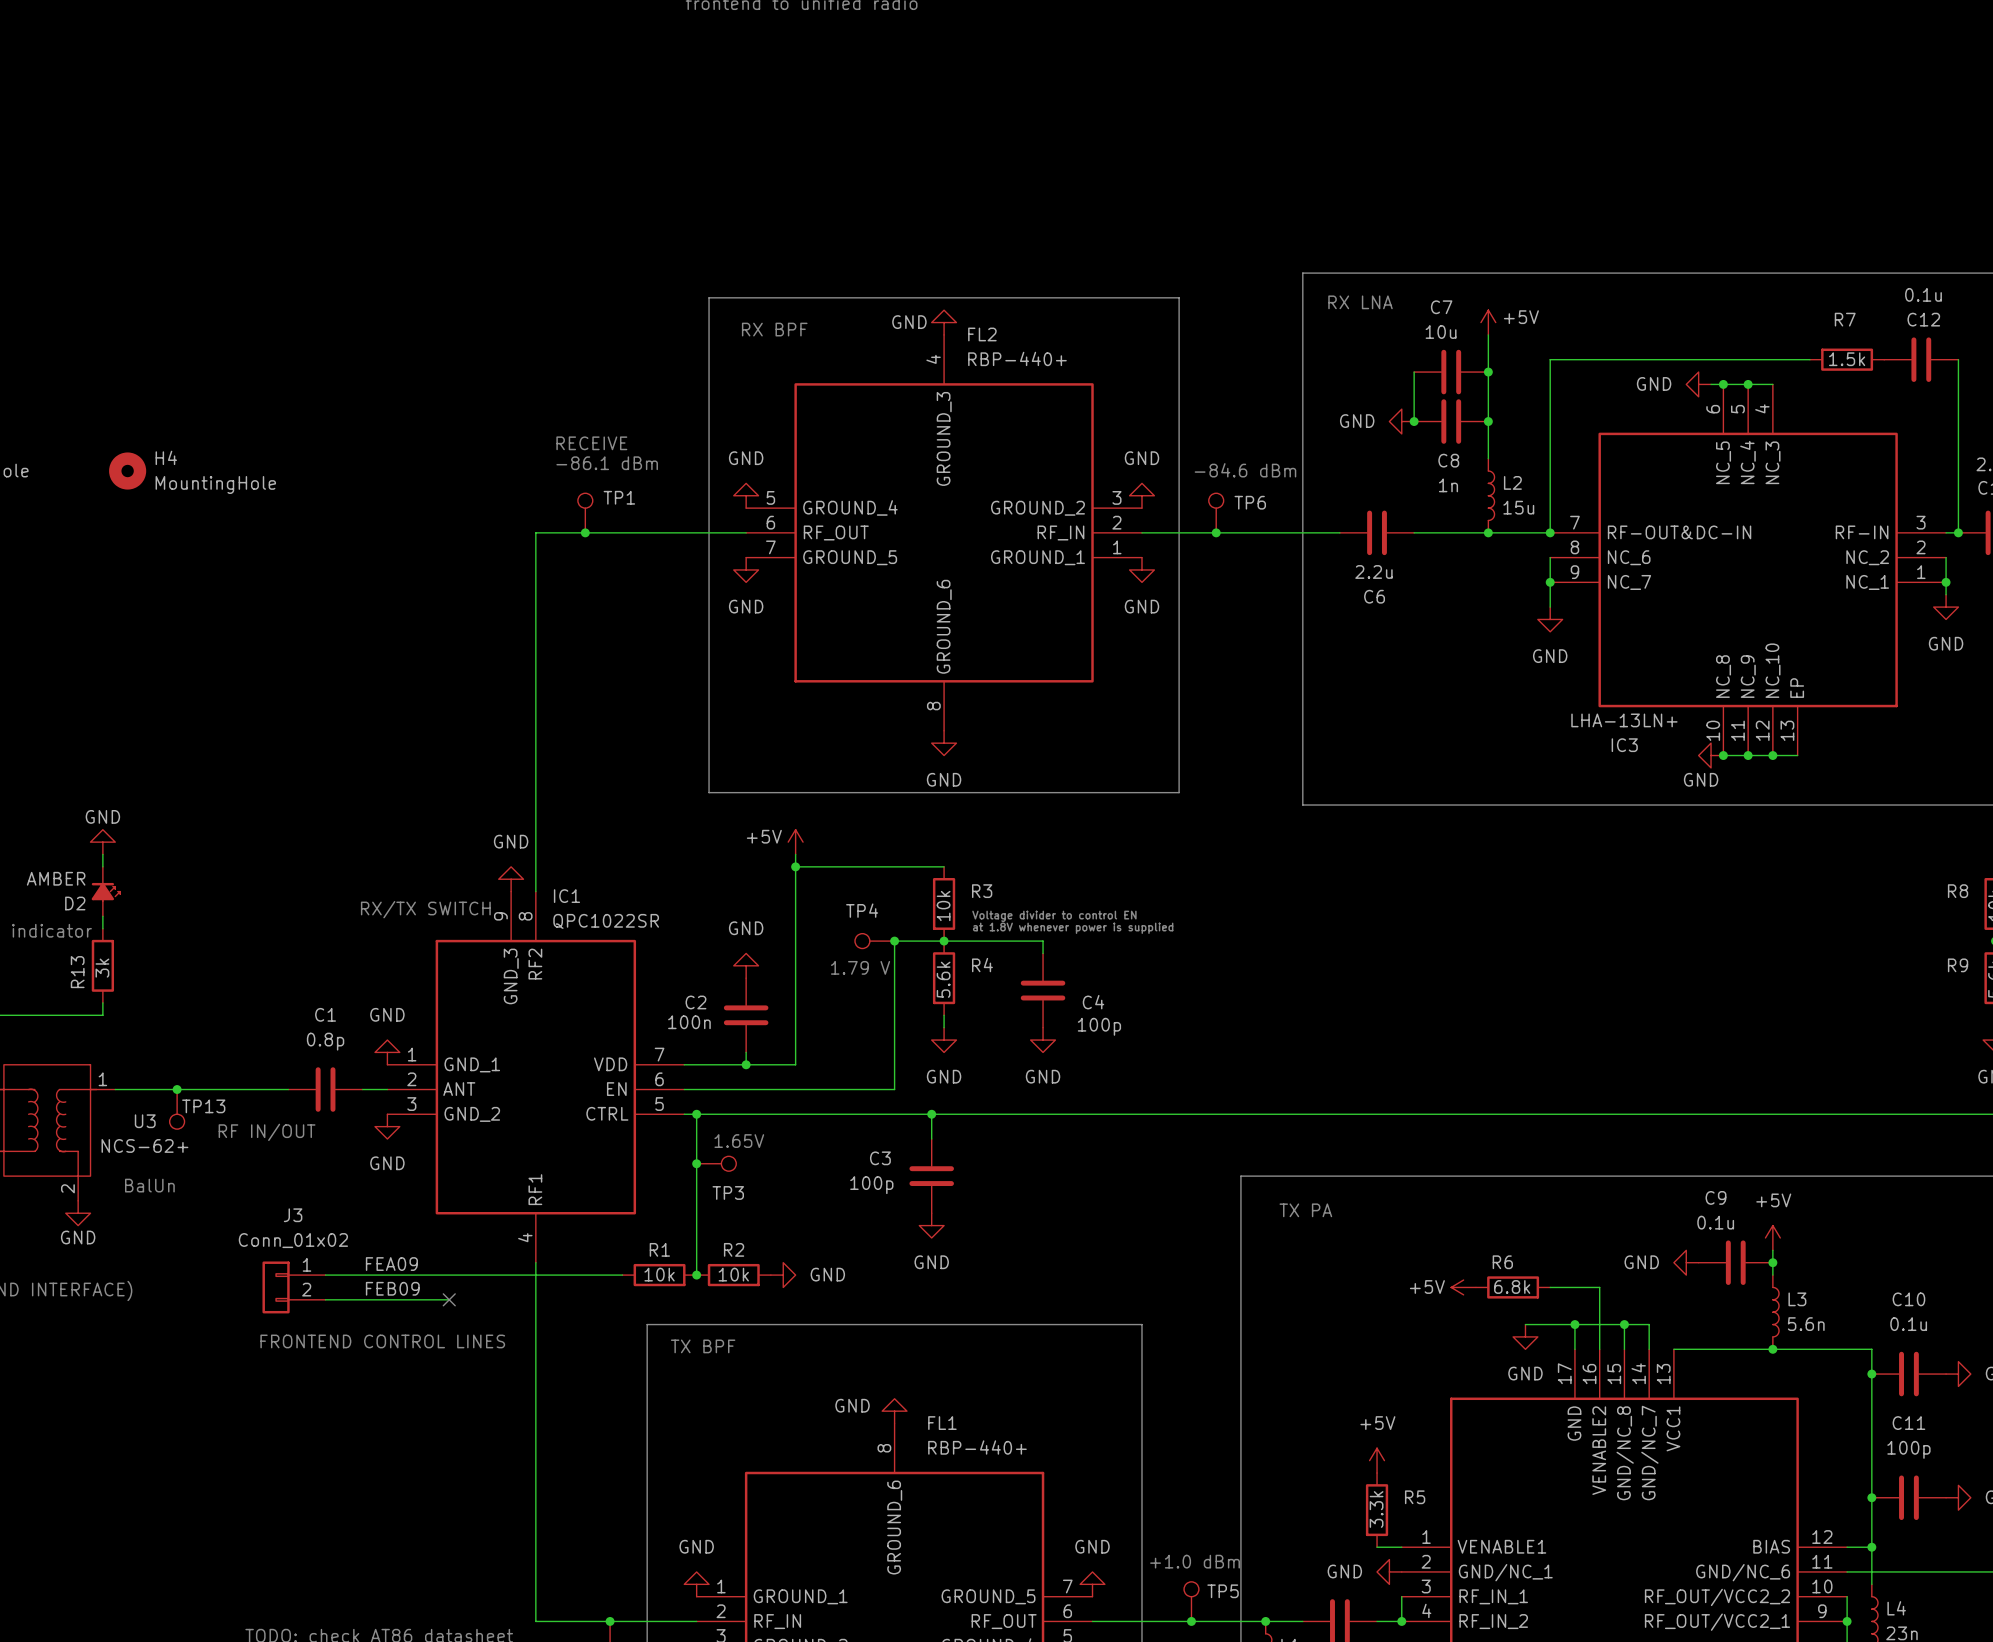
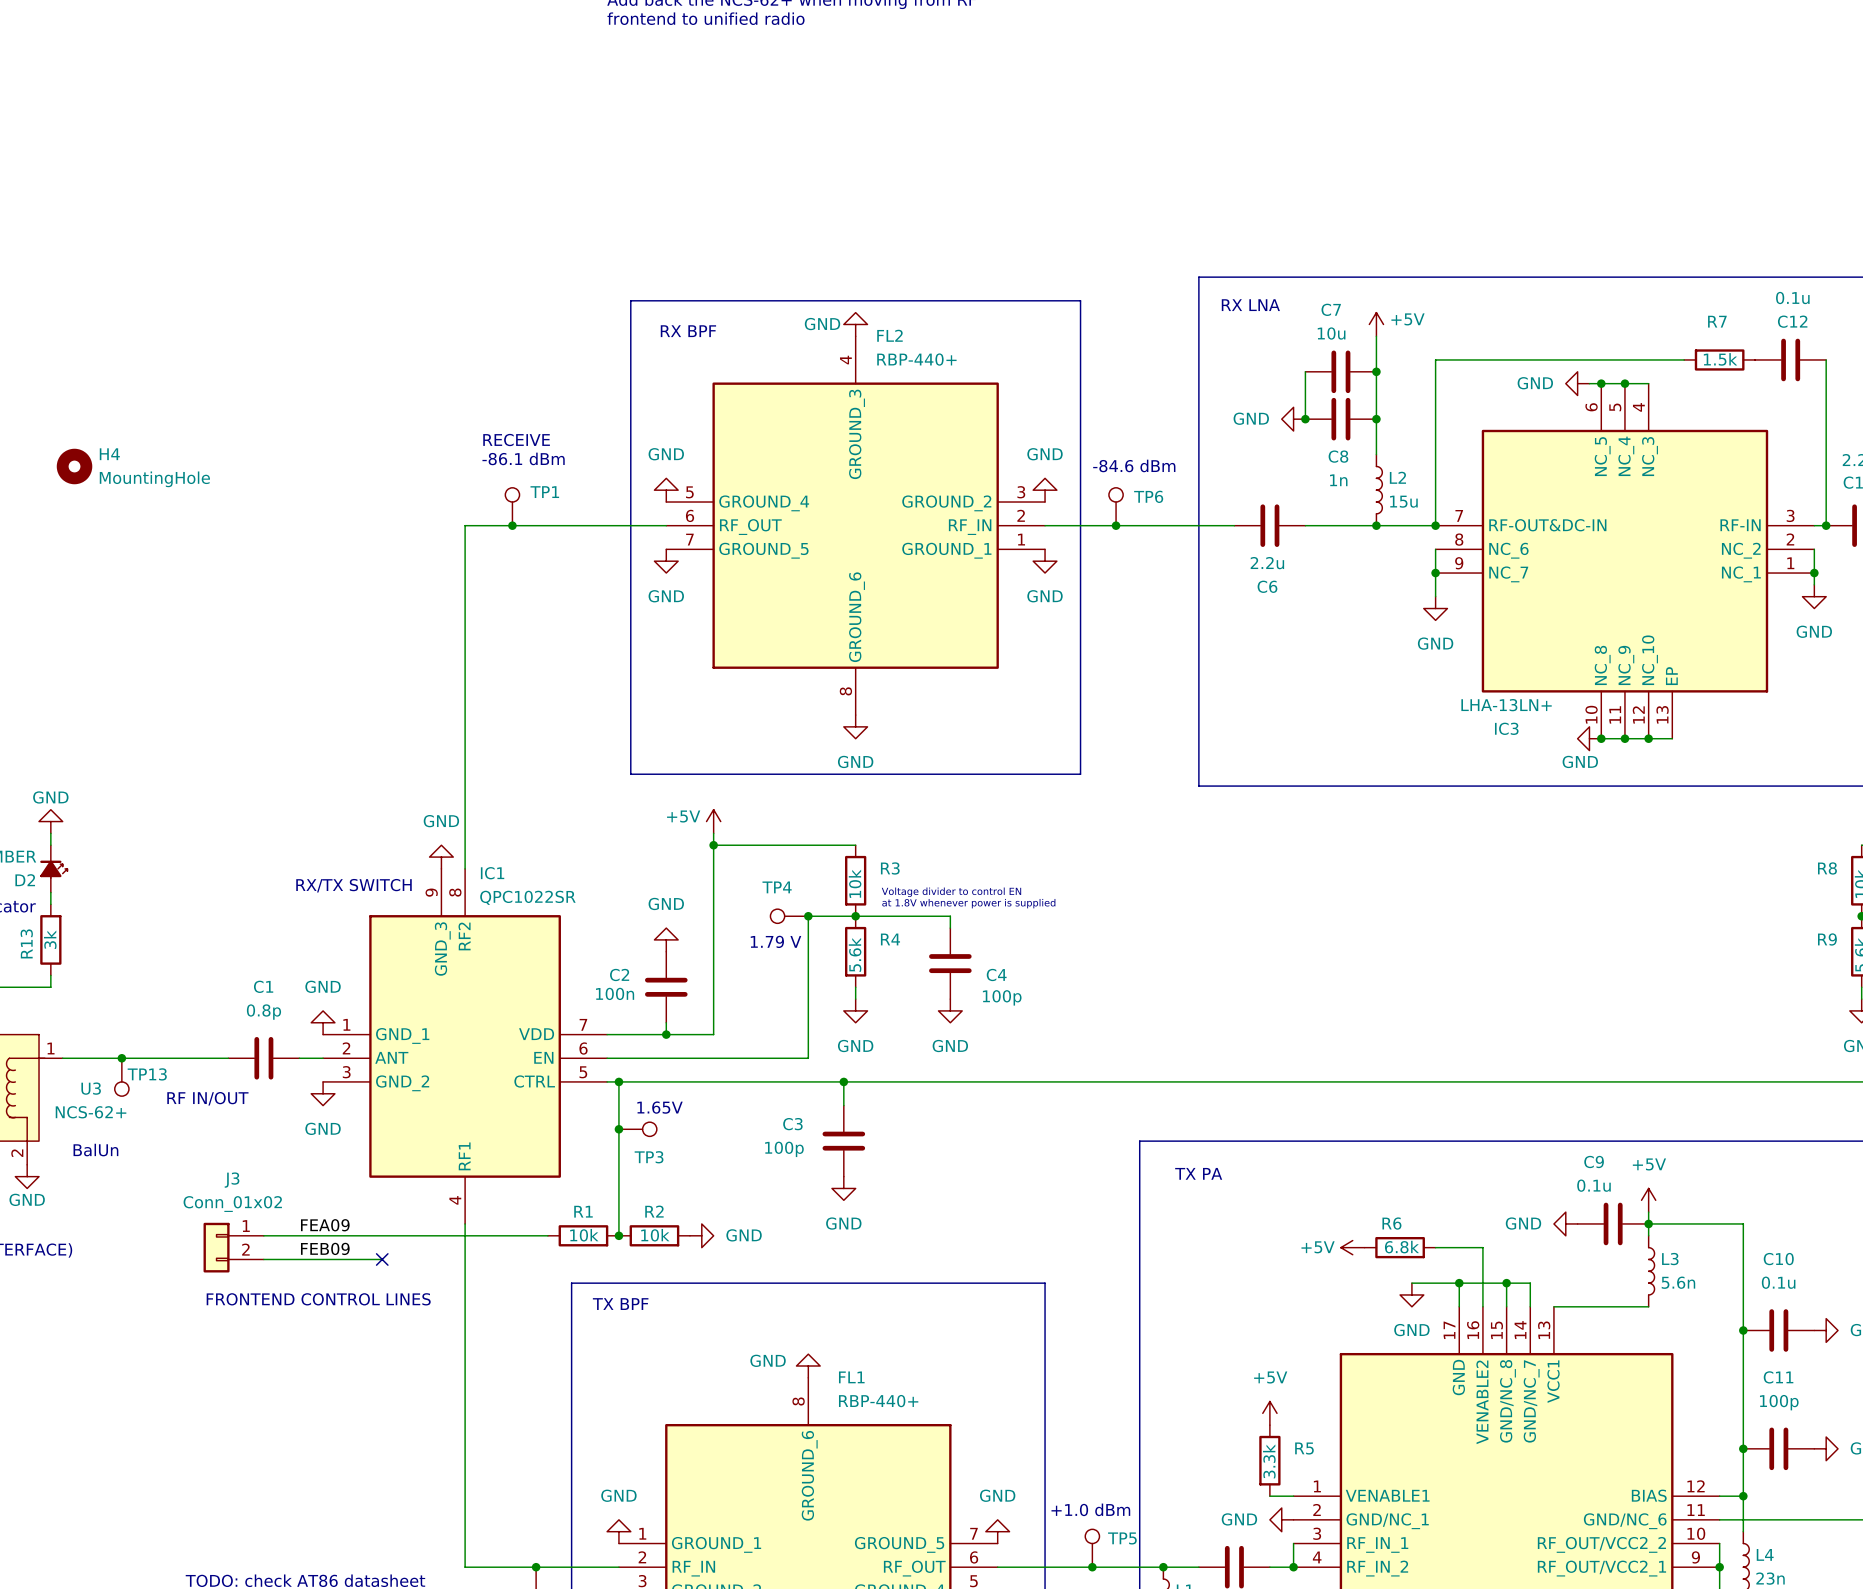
wire: (1772, 1349) (1871, 1349) -> (1648, 1223) (1743, 1223) (1743, 1306)
junction: (1772, 1349) -> none

